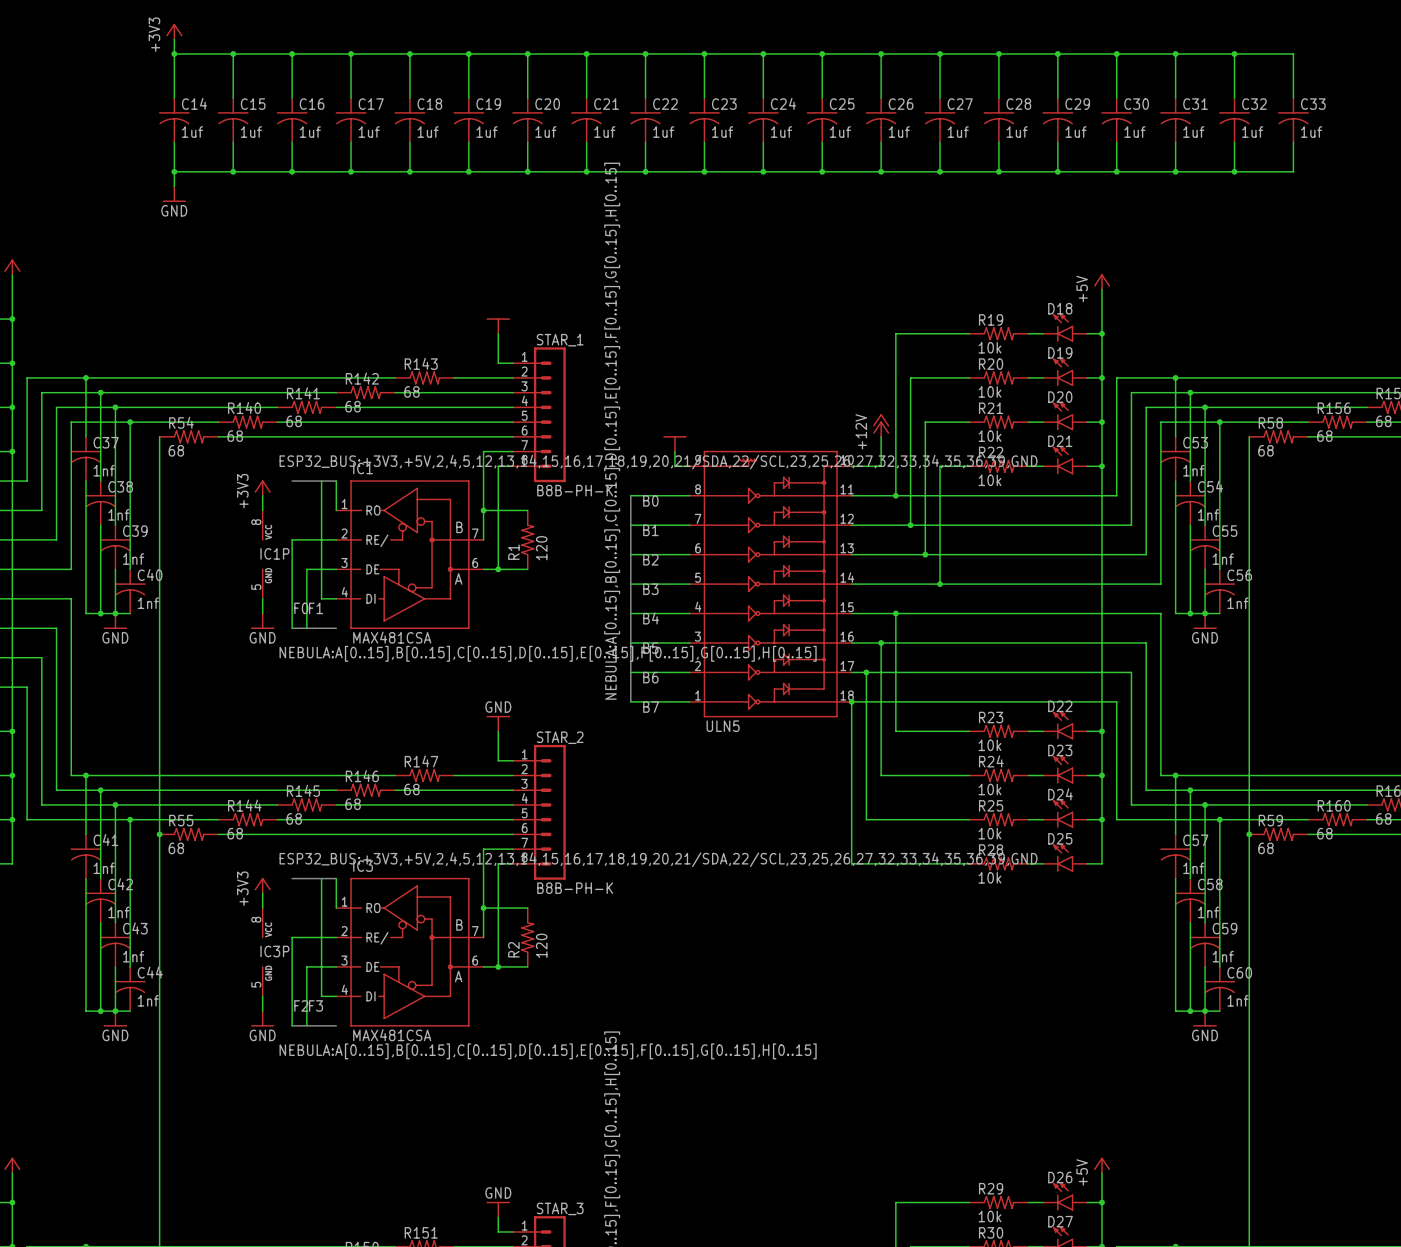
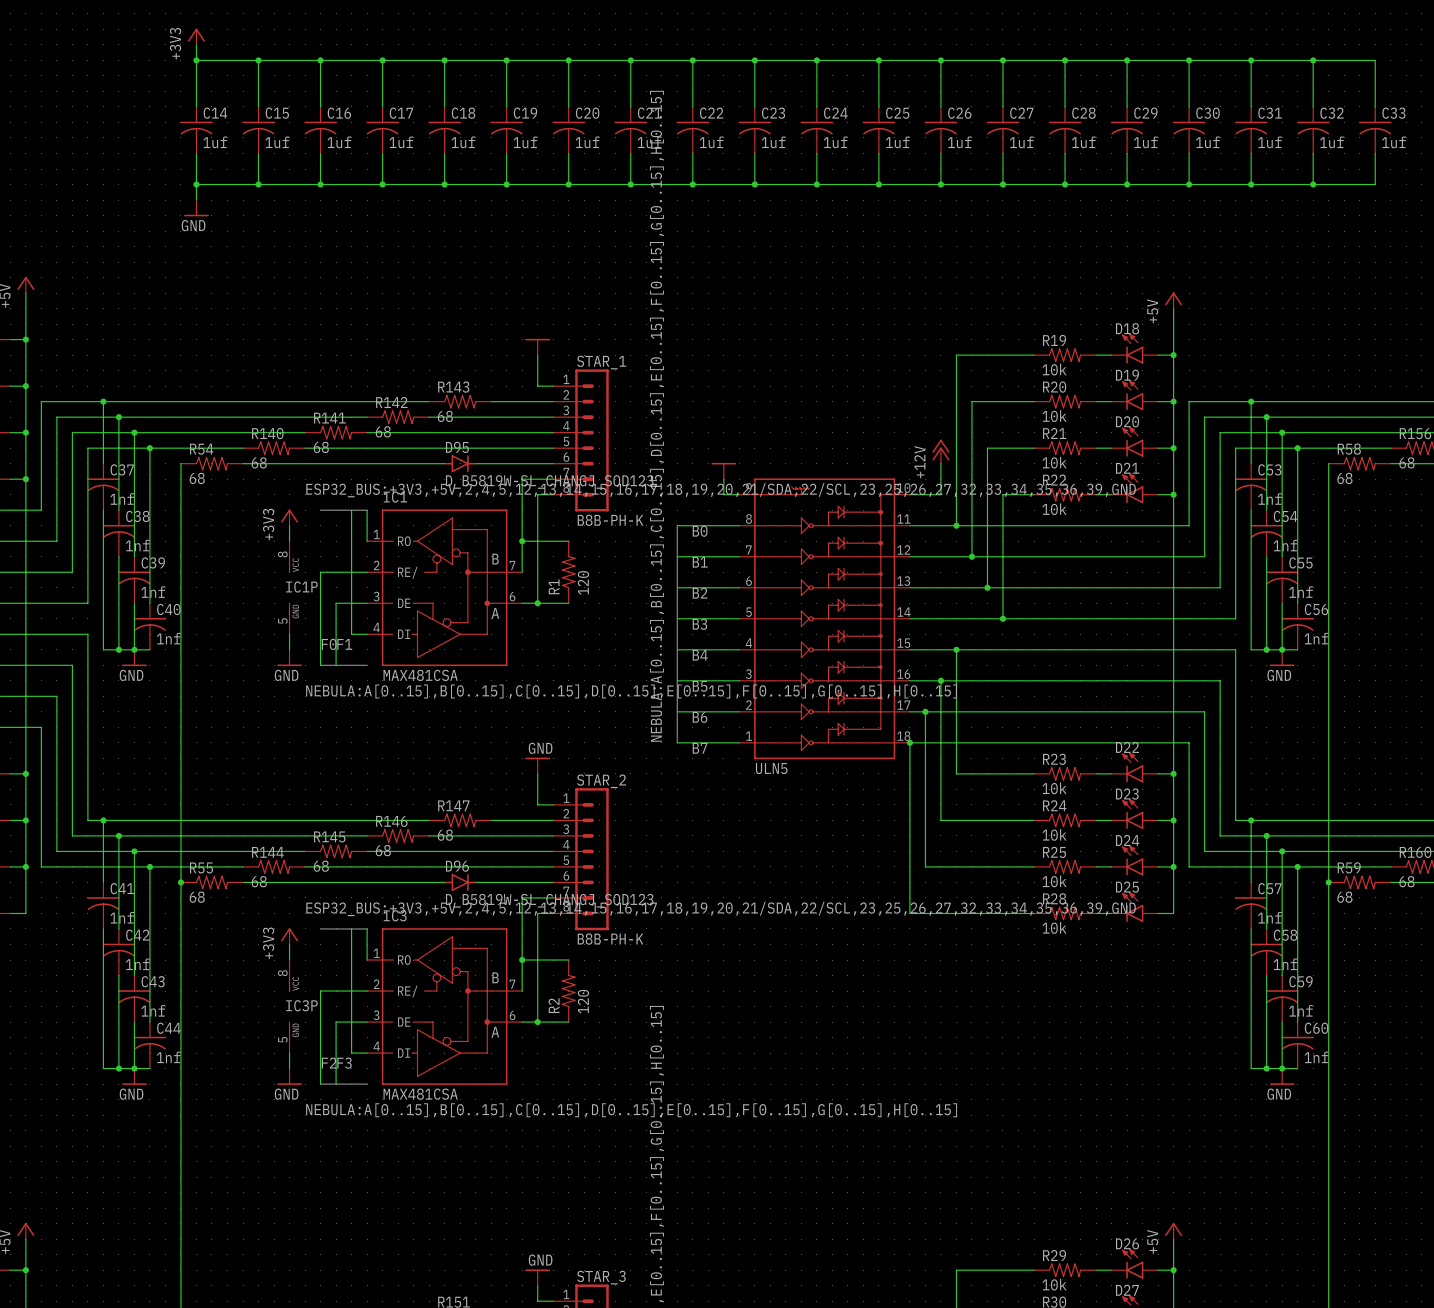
D95: none -> D_B5819W-SL_CHANGJ_SOD123 (460, 463)
D96: none -> D_B5819W-SL_CHANGJ_SOD123 (460, 882)

